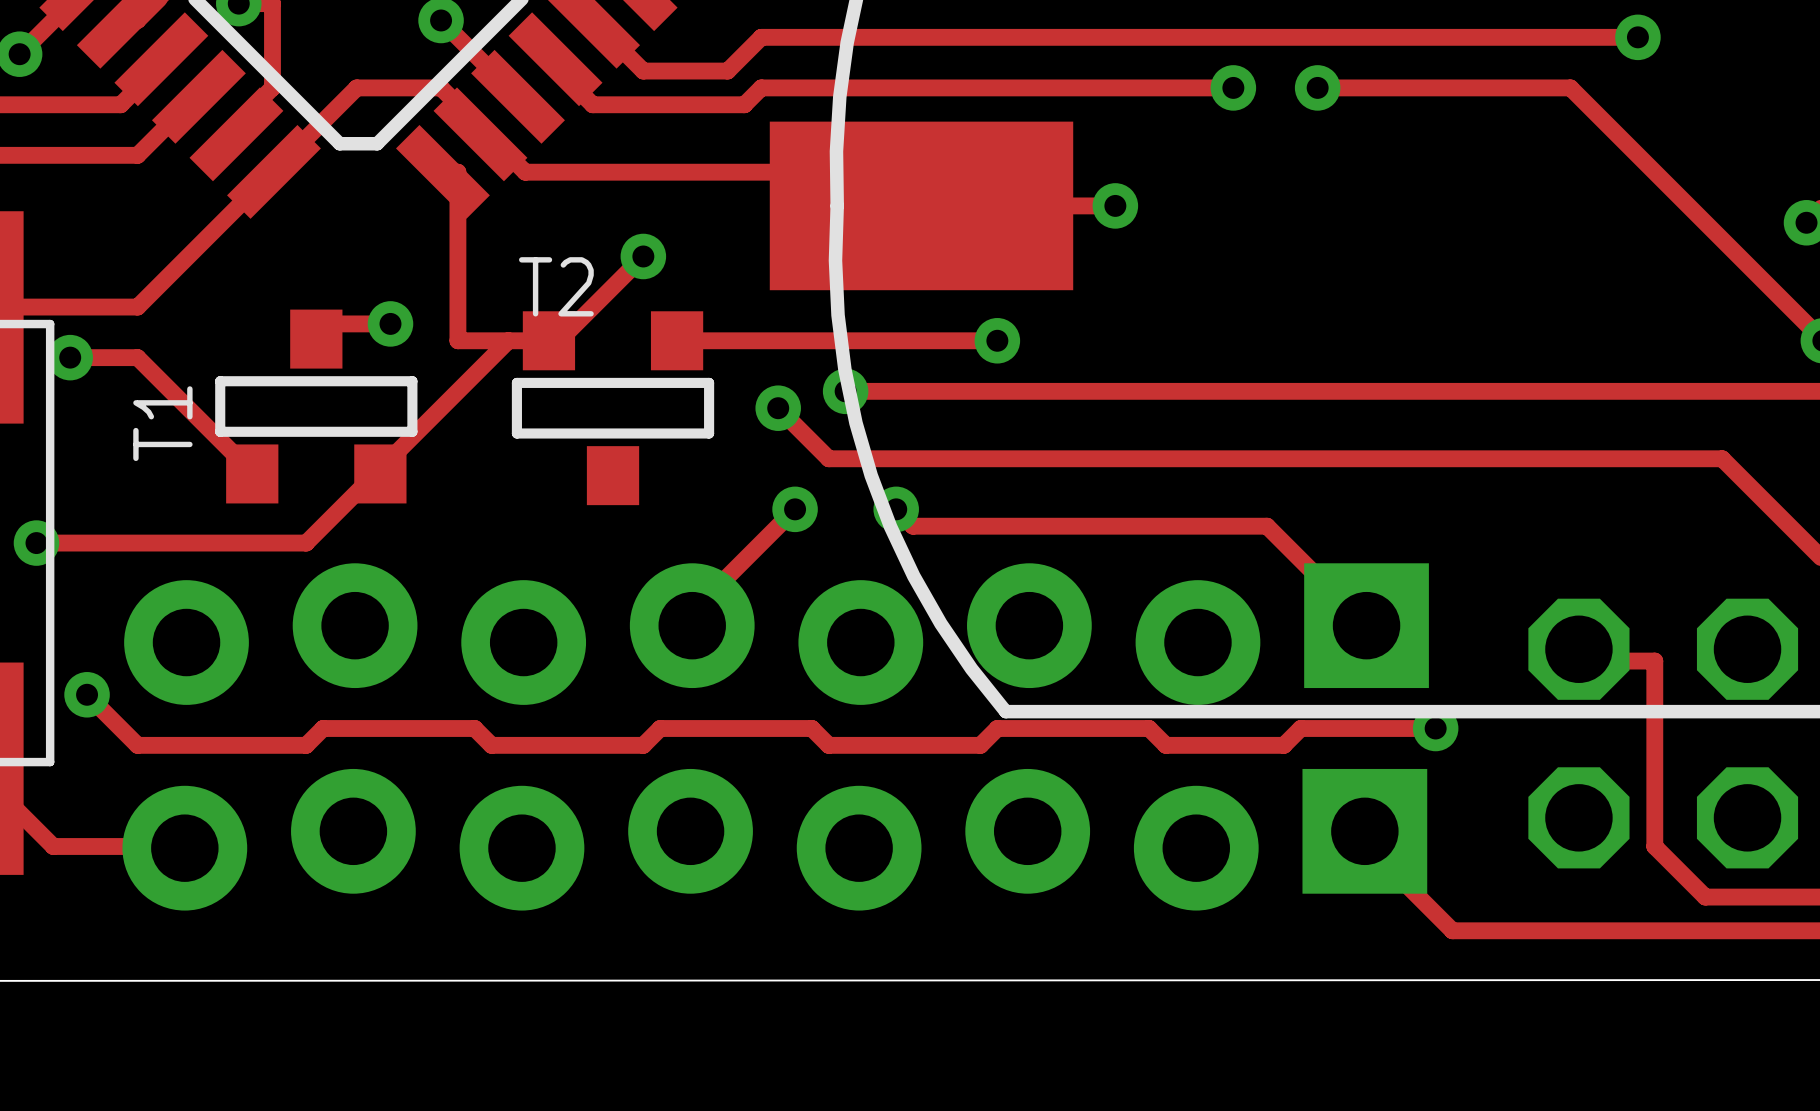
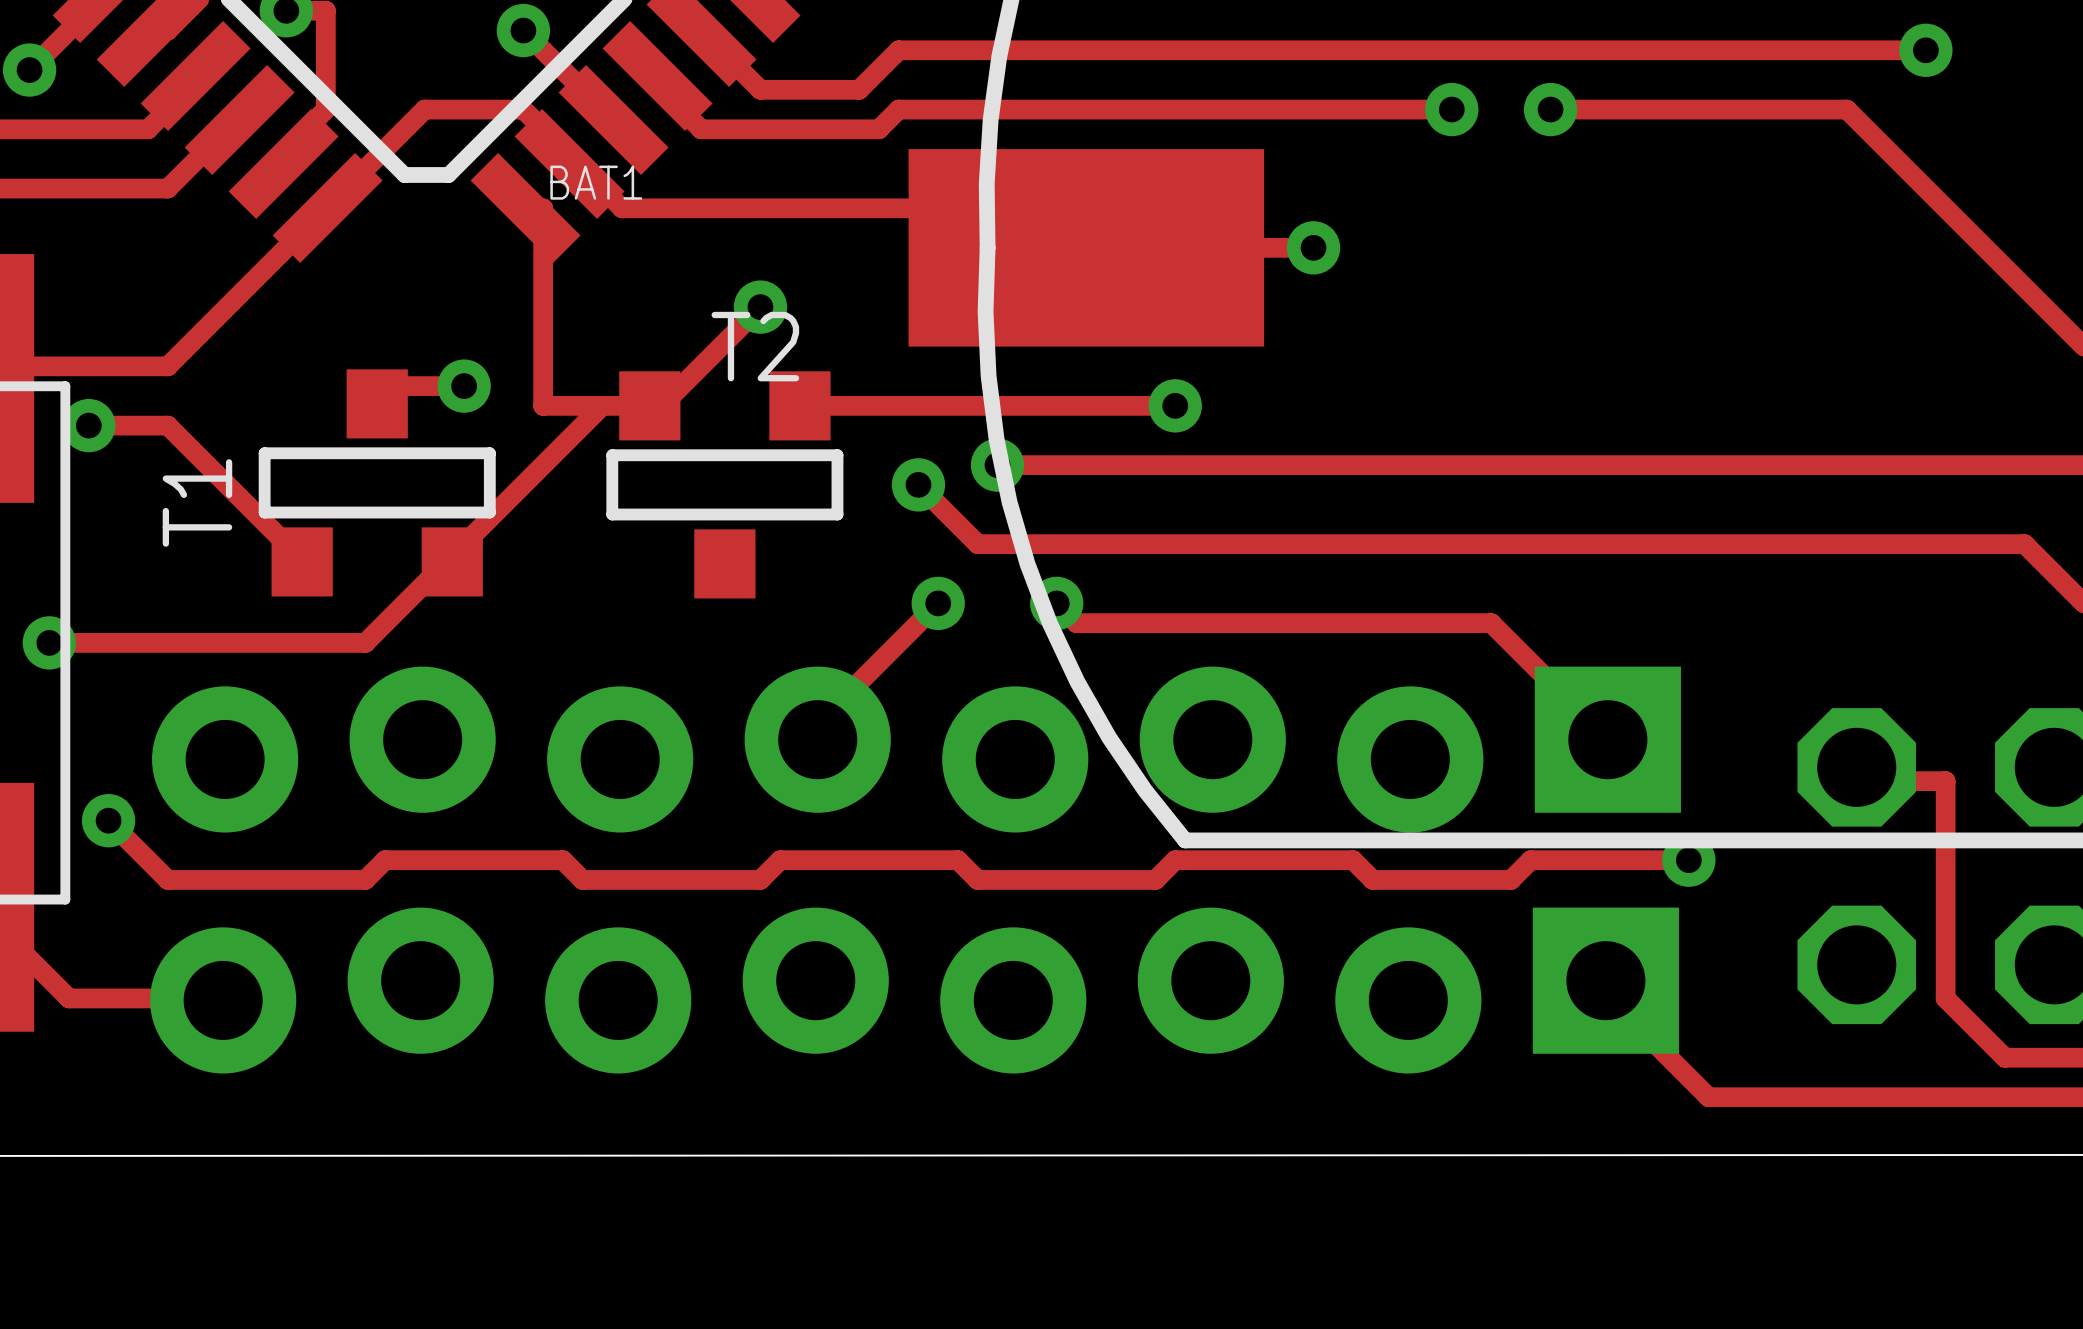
BAT1 name: none -> BAT1 (596, 182)
T2 name position: T2 (556, 286) -> T2 (755, 346)

